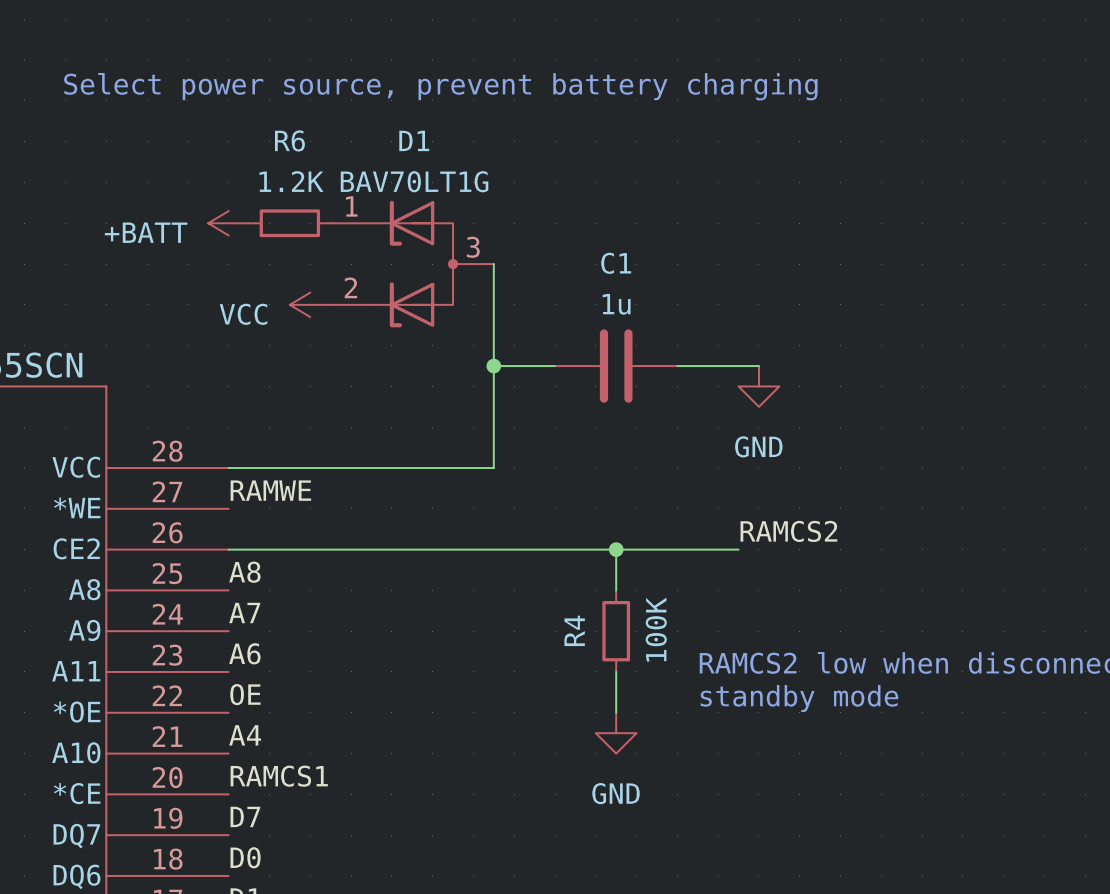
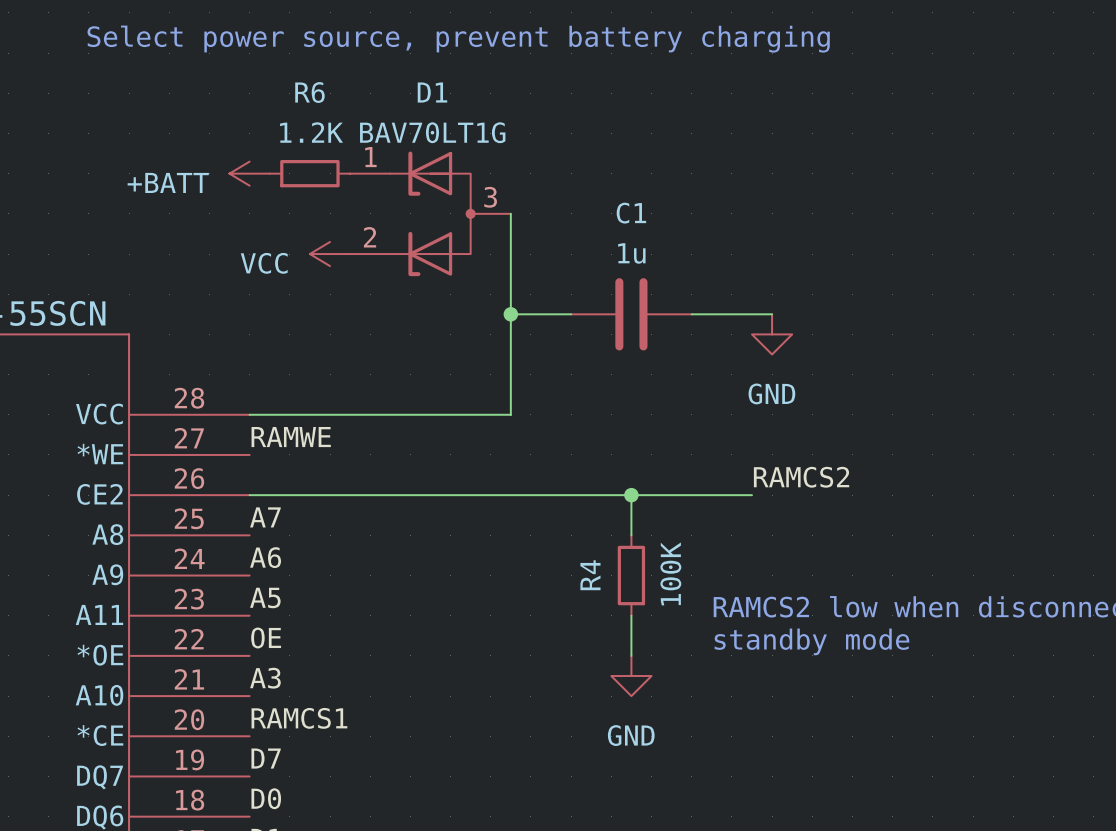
label: A8 (244, 572) -> A7 (265, 517)
label: A7 (244, 612) -> A6 (265, 557)
label: A6 (244, 653) -> A5 (265, 597)
label: A4 (245, 735) -> A3 (265, 678)

